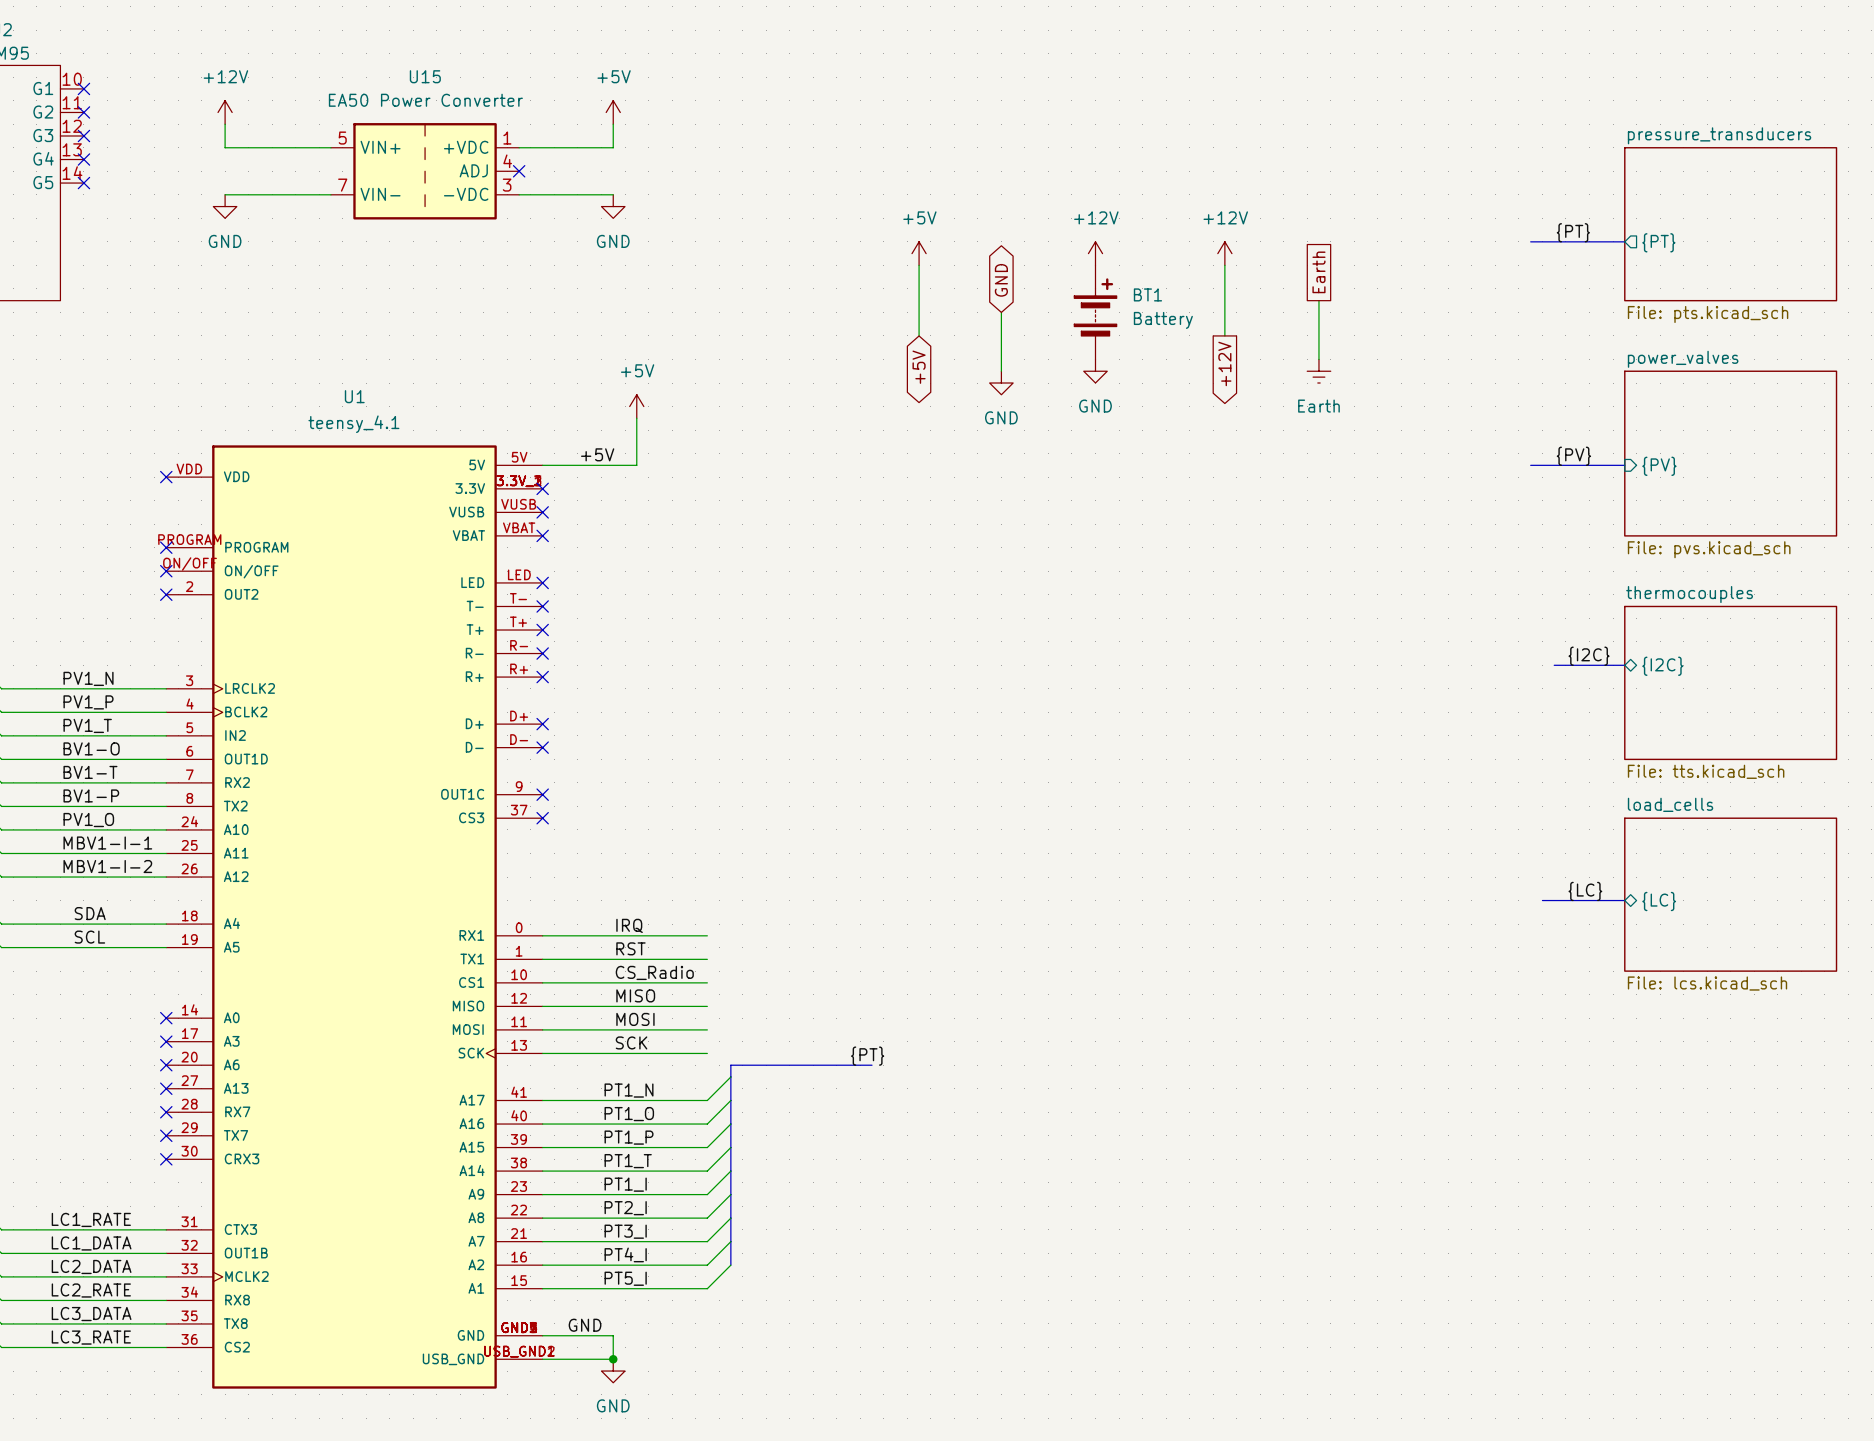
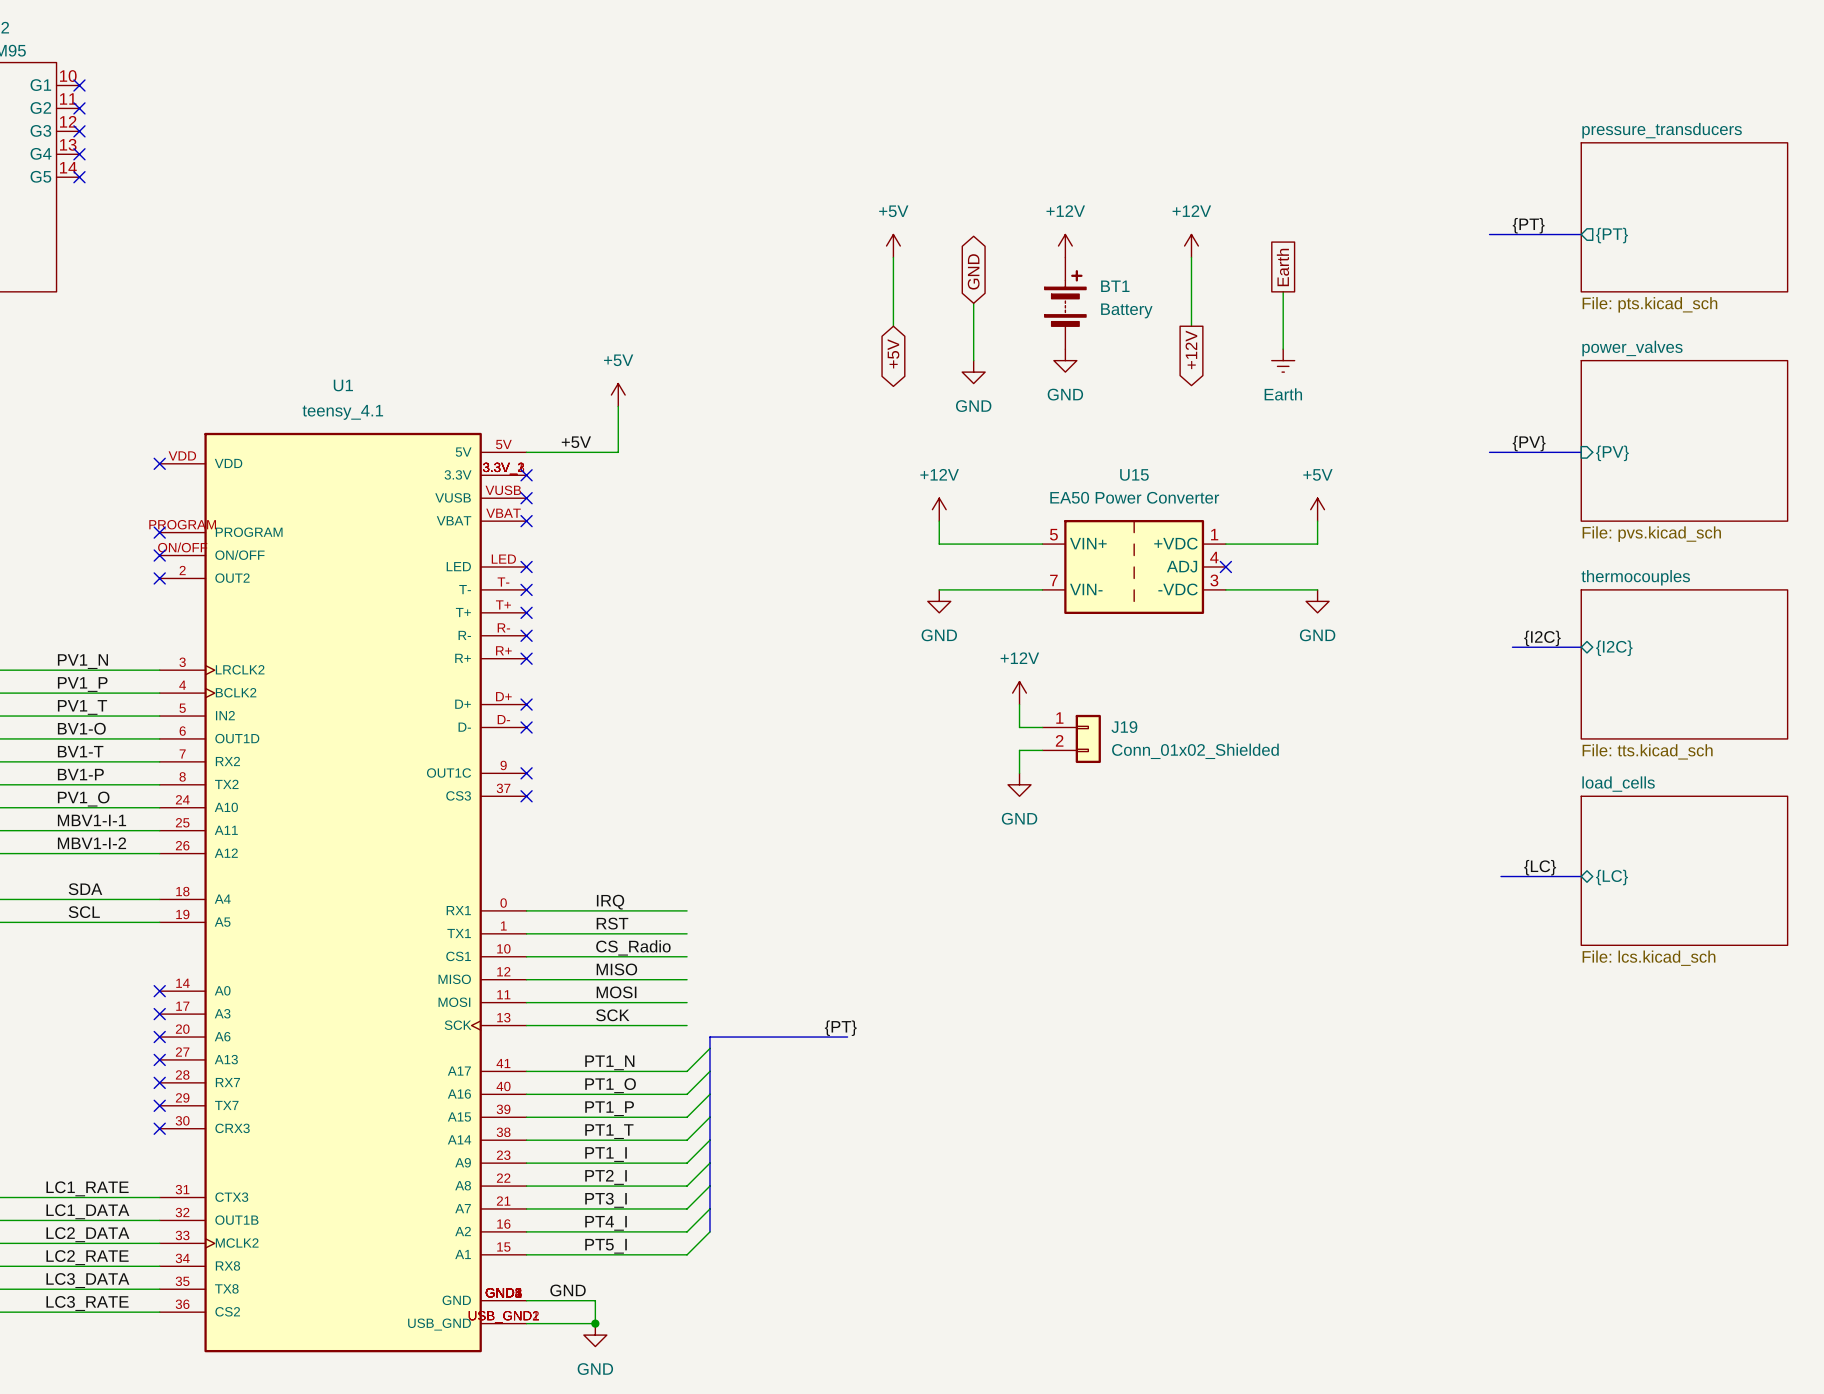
power symbol: +12V (225, 112) -> none
power symbol: +5V (613, 112) -> none
wire: (225, 124) (225, 147) (330, 147) -> none
wire: (613, 124) (613, 147) (519, 147) -> none
U15 position: (425, 171) -> (1134, 566)
no-connect mark: (519, 171) -> none
wire: (225, 194) (330, 194) -> none
wire: (519, 194) (613, 194) -> none
power symbol: GND (225, 206) -> none
power symbol: GND (613, 206) -> none
power symbol: none -> +12V (939, 509)
power symbol: none -> +5V (1317, 509)
wire: none -> (939, 521) (939, 544) (1042, 544)
wire: none -> (1317, 521) (1317, 544) (1225, 544)
no-connect mark: none -> (1225, 566)
wire: none -> (939, 589) (1042, 589)
wire: none -> (1225, 589) (1317, 589)
power symbol: none -> GND (939, 601)
power symbol: none -> GND (1317, 601)
power symbol: none -> +12V (1019, 693)
wire: none -> (1019, 704) (1019, 727) (1042, 727)
J19: none -> Conn_01x02_Shielded (1071, 738)
wire: none -> (1042, 750) (1019, 750) (1019, 773)
power symbol: none -> GND (1019, 784)

